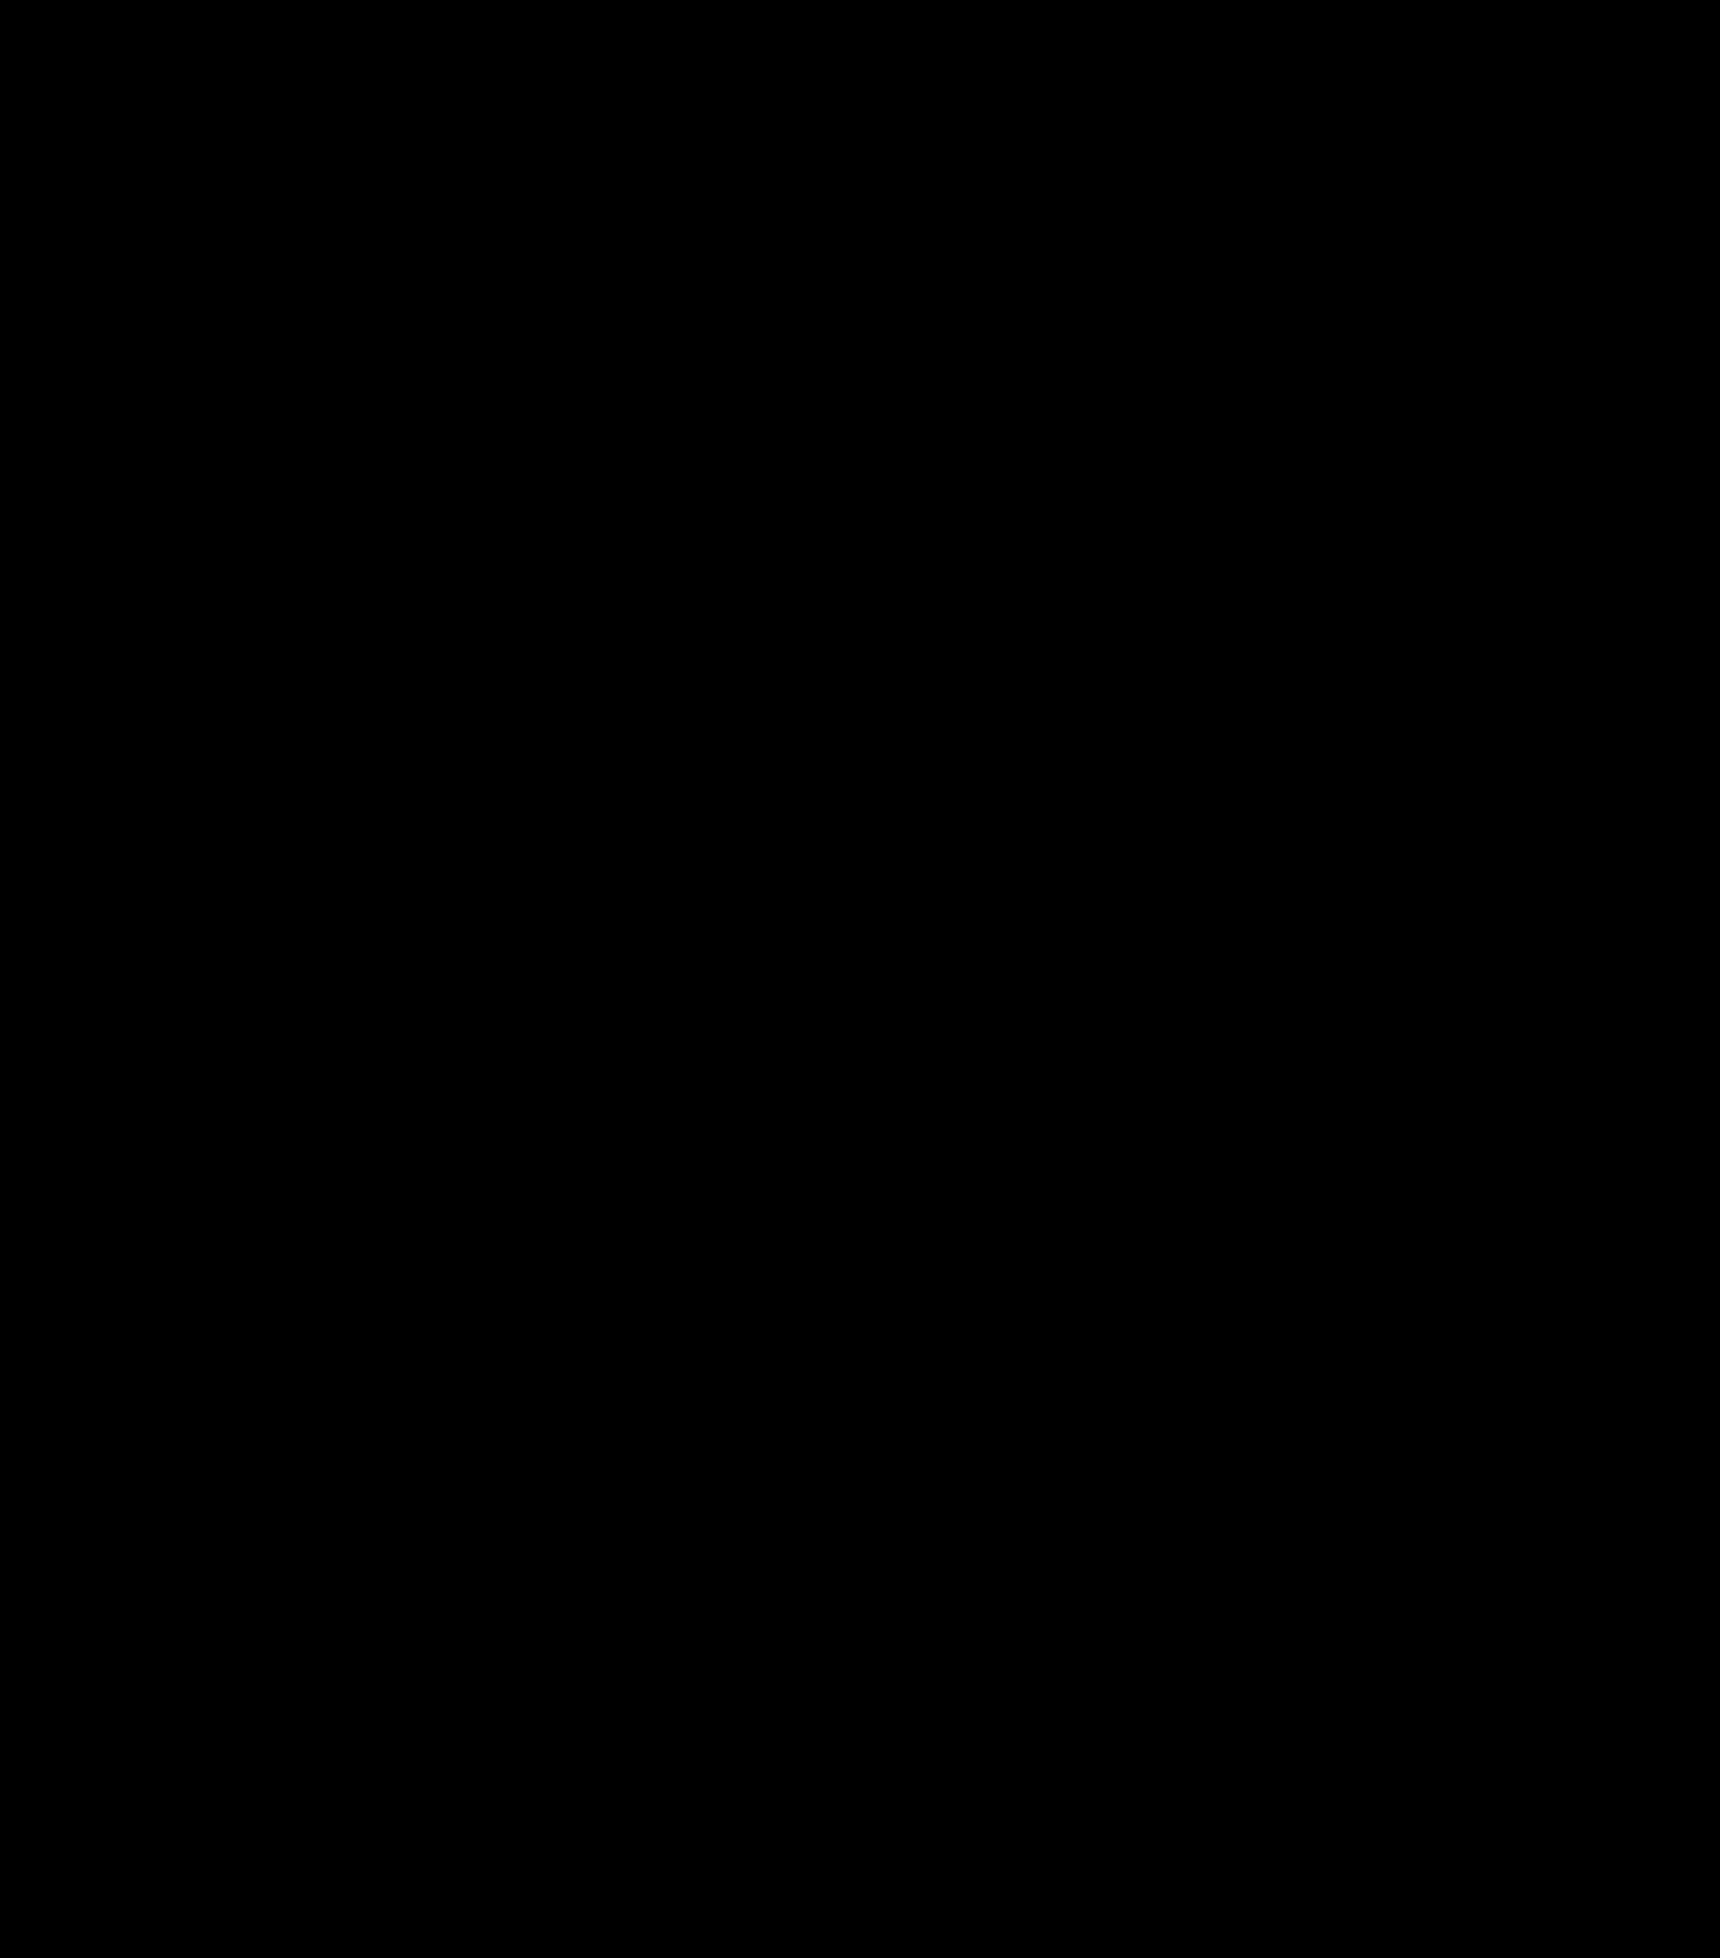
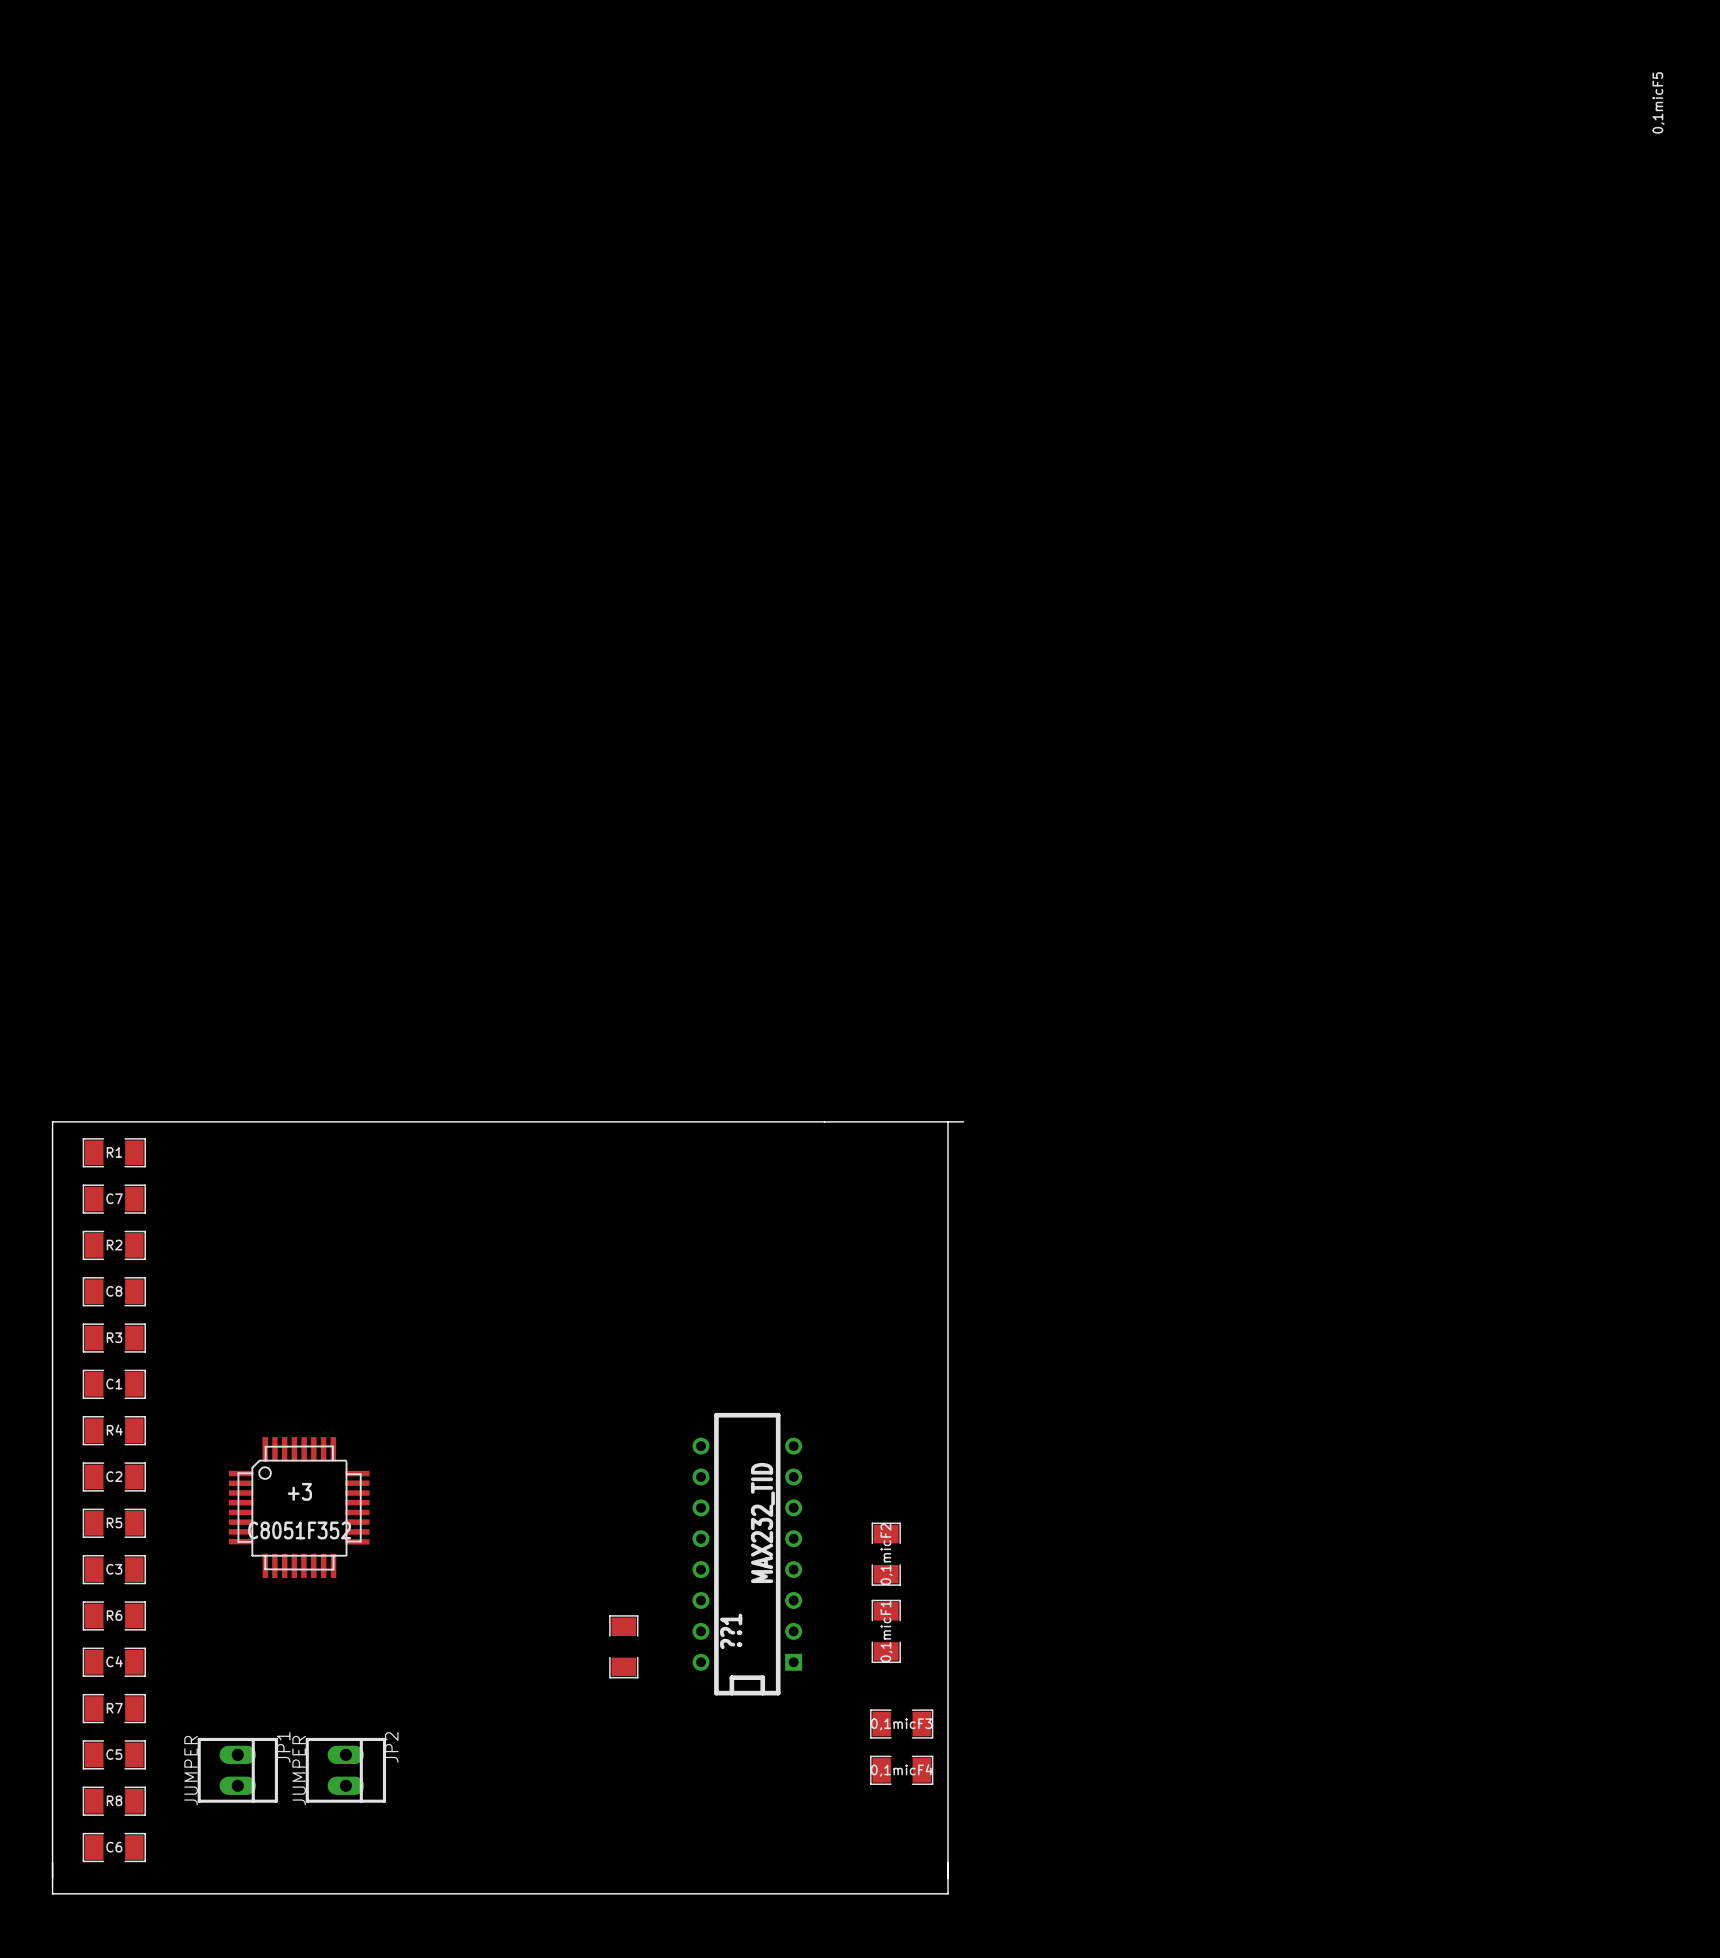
board edge: none -> (948, 1121) (948, 1893) (52, 1893) (52, 1121) (963, 1121)
R1: none -> (114, 1152)
C7: none -> (114, 1199)
R2: none -> (114, 1245)
C8: none -> (114, 1291)
R3: none -> (114, 1338)
C1: none -> (114, 1384)
R4: none -> (114, 1430)
C2: none -> (114, 1476)
+3: none -> C8051F352 (299, 1507)
R5: none -> (114, 1523)
??1: none -> MAX232_TID (747, 1554)
0,1micF2: none -> (886, 1554)
C3: none -> (114, 1569)
R6: none -> (114, 1615)
0,1micF1: none -> (886, 1631)
0,1micF5: none -> (623, 1646)
C4: none -> (114, 1662)
R7: none -> (114, 1708)
0,1micF3: none -> (901, 1724)
C5: none -> (114, 1754)
JP1: none -> JUMPER (237, 1770)
JP2: none -> JUMPER (345, 1770)
0,1micF4: none -> (901, 1770)
R8: none -> (114, 1801)
C6: none -> (114, 1847)

